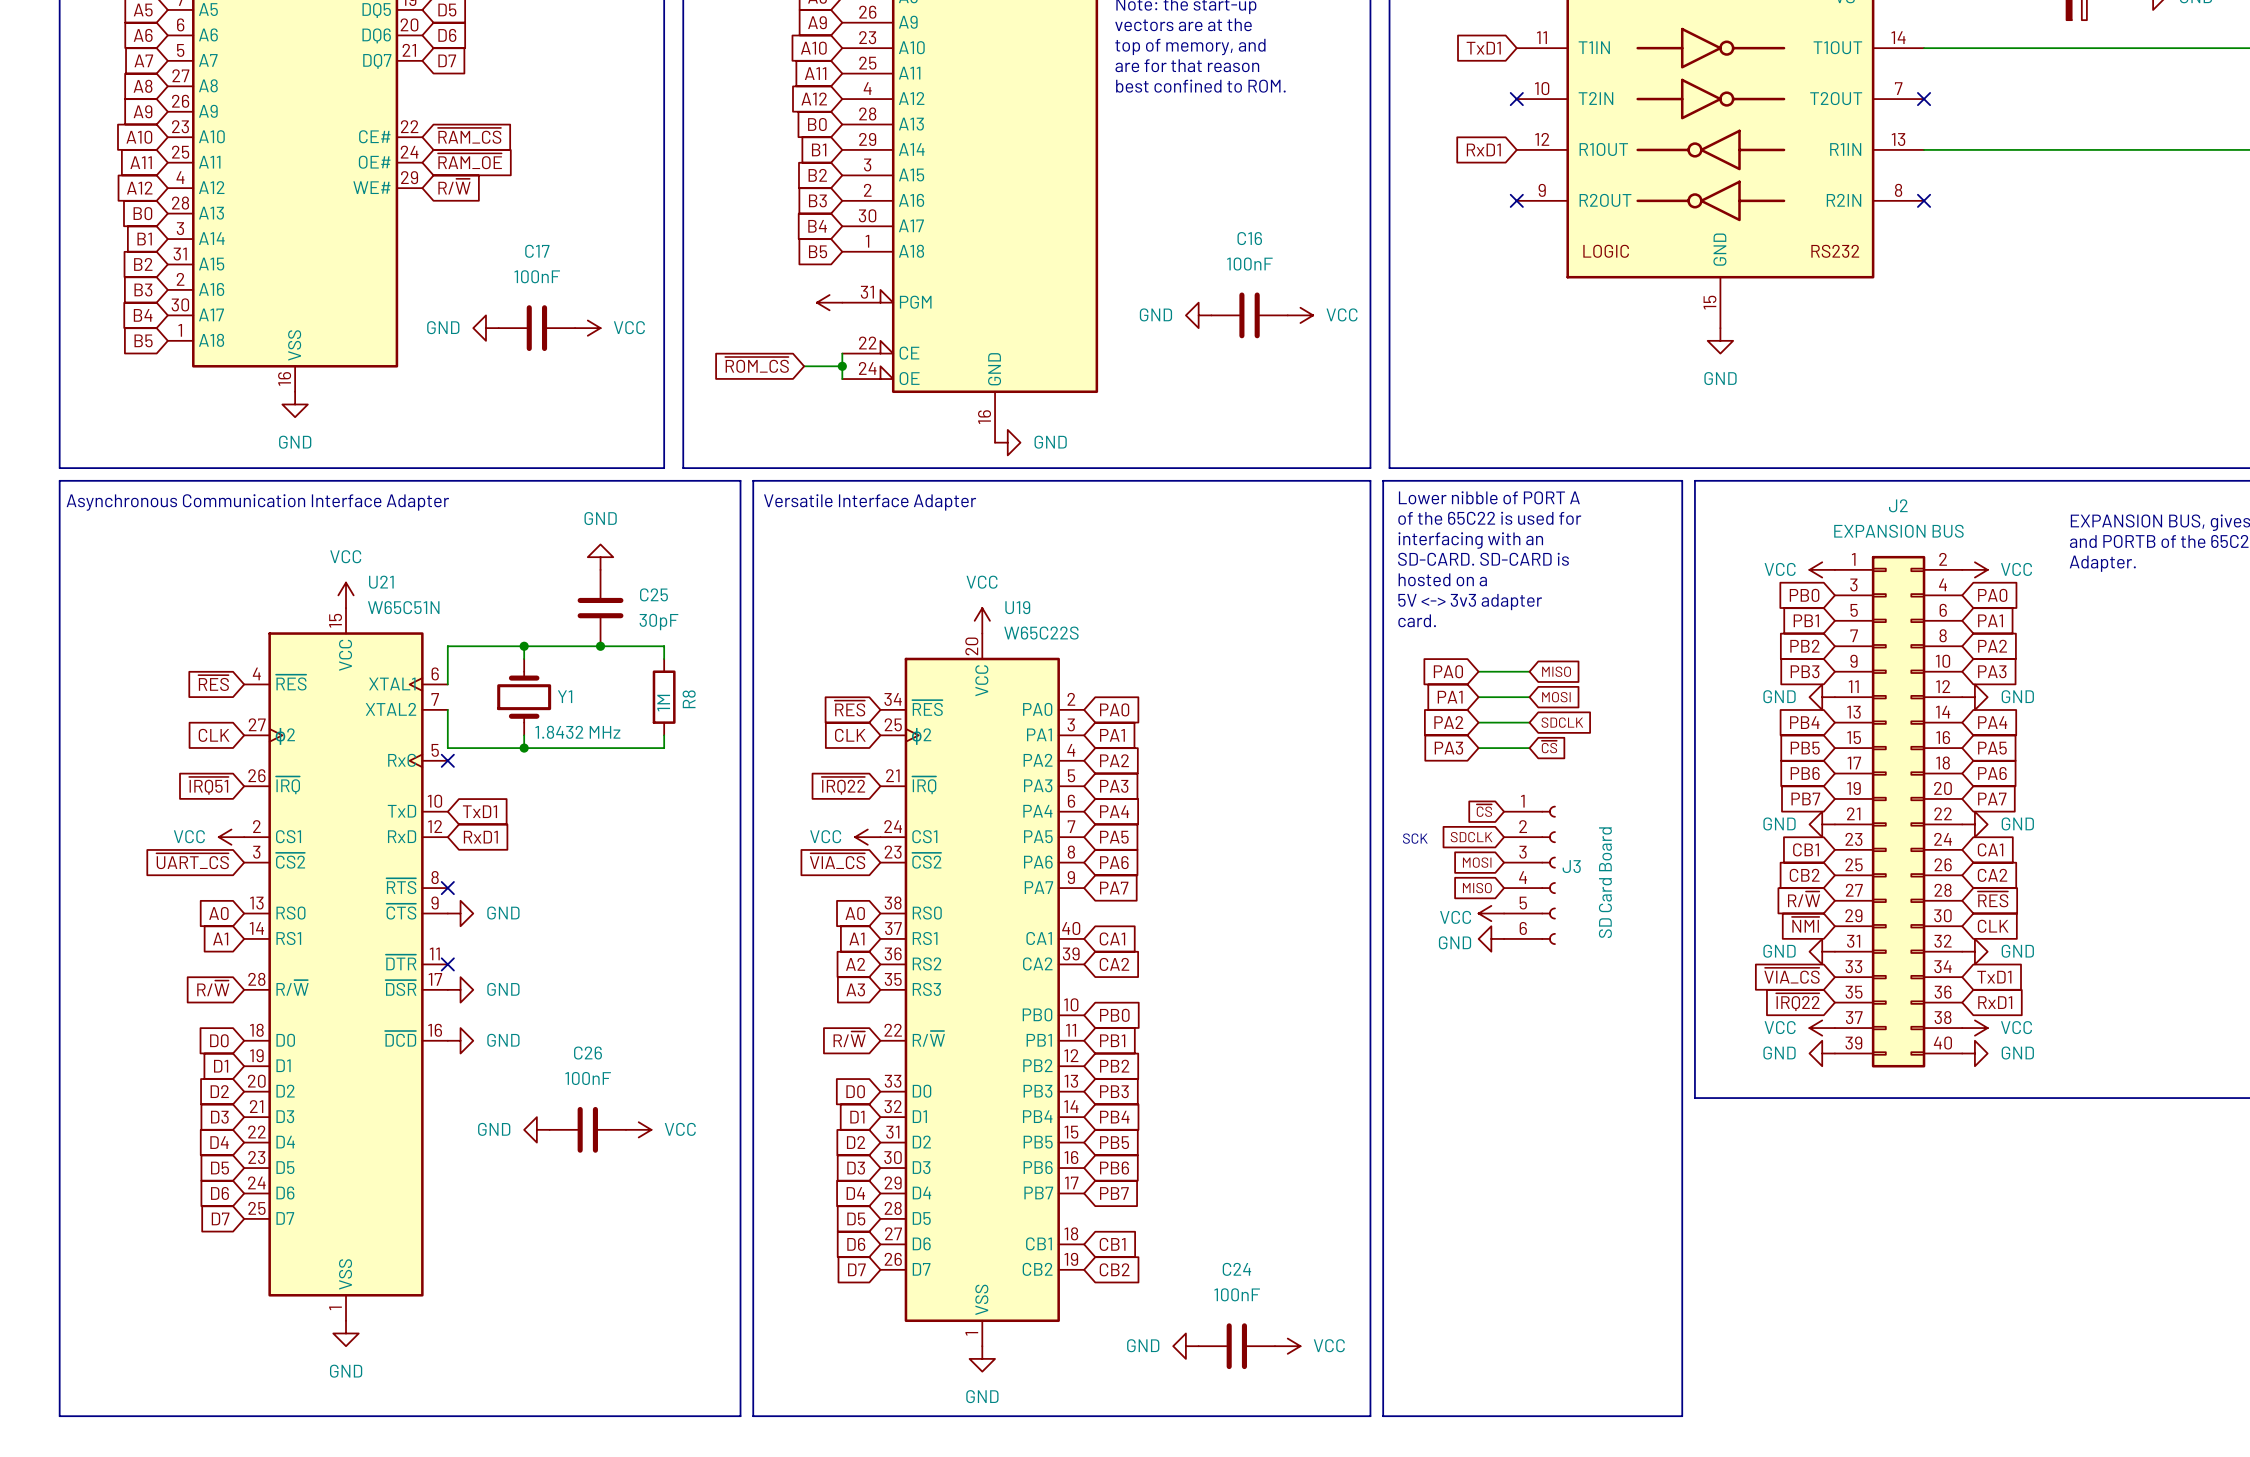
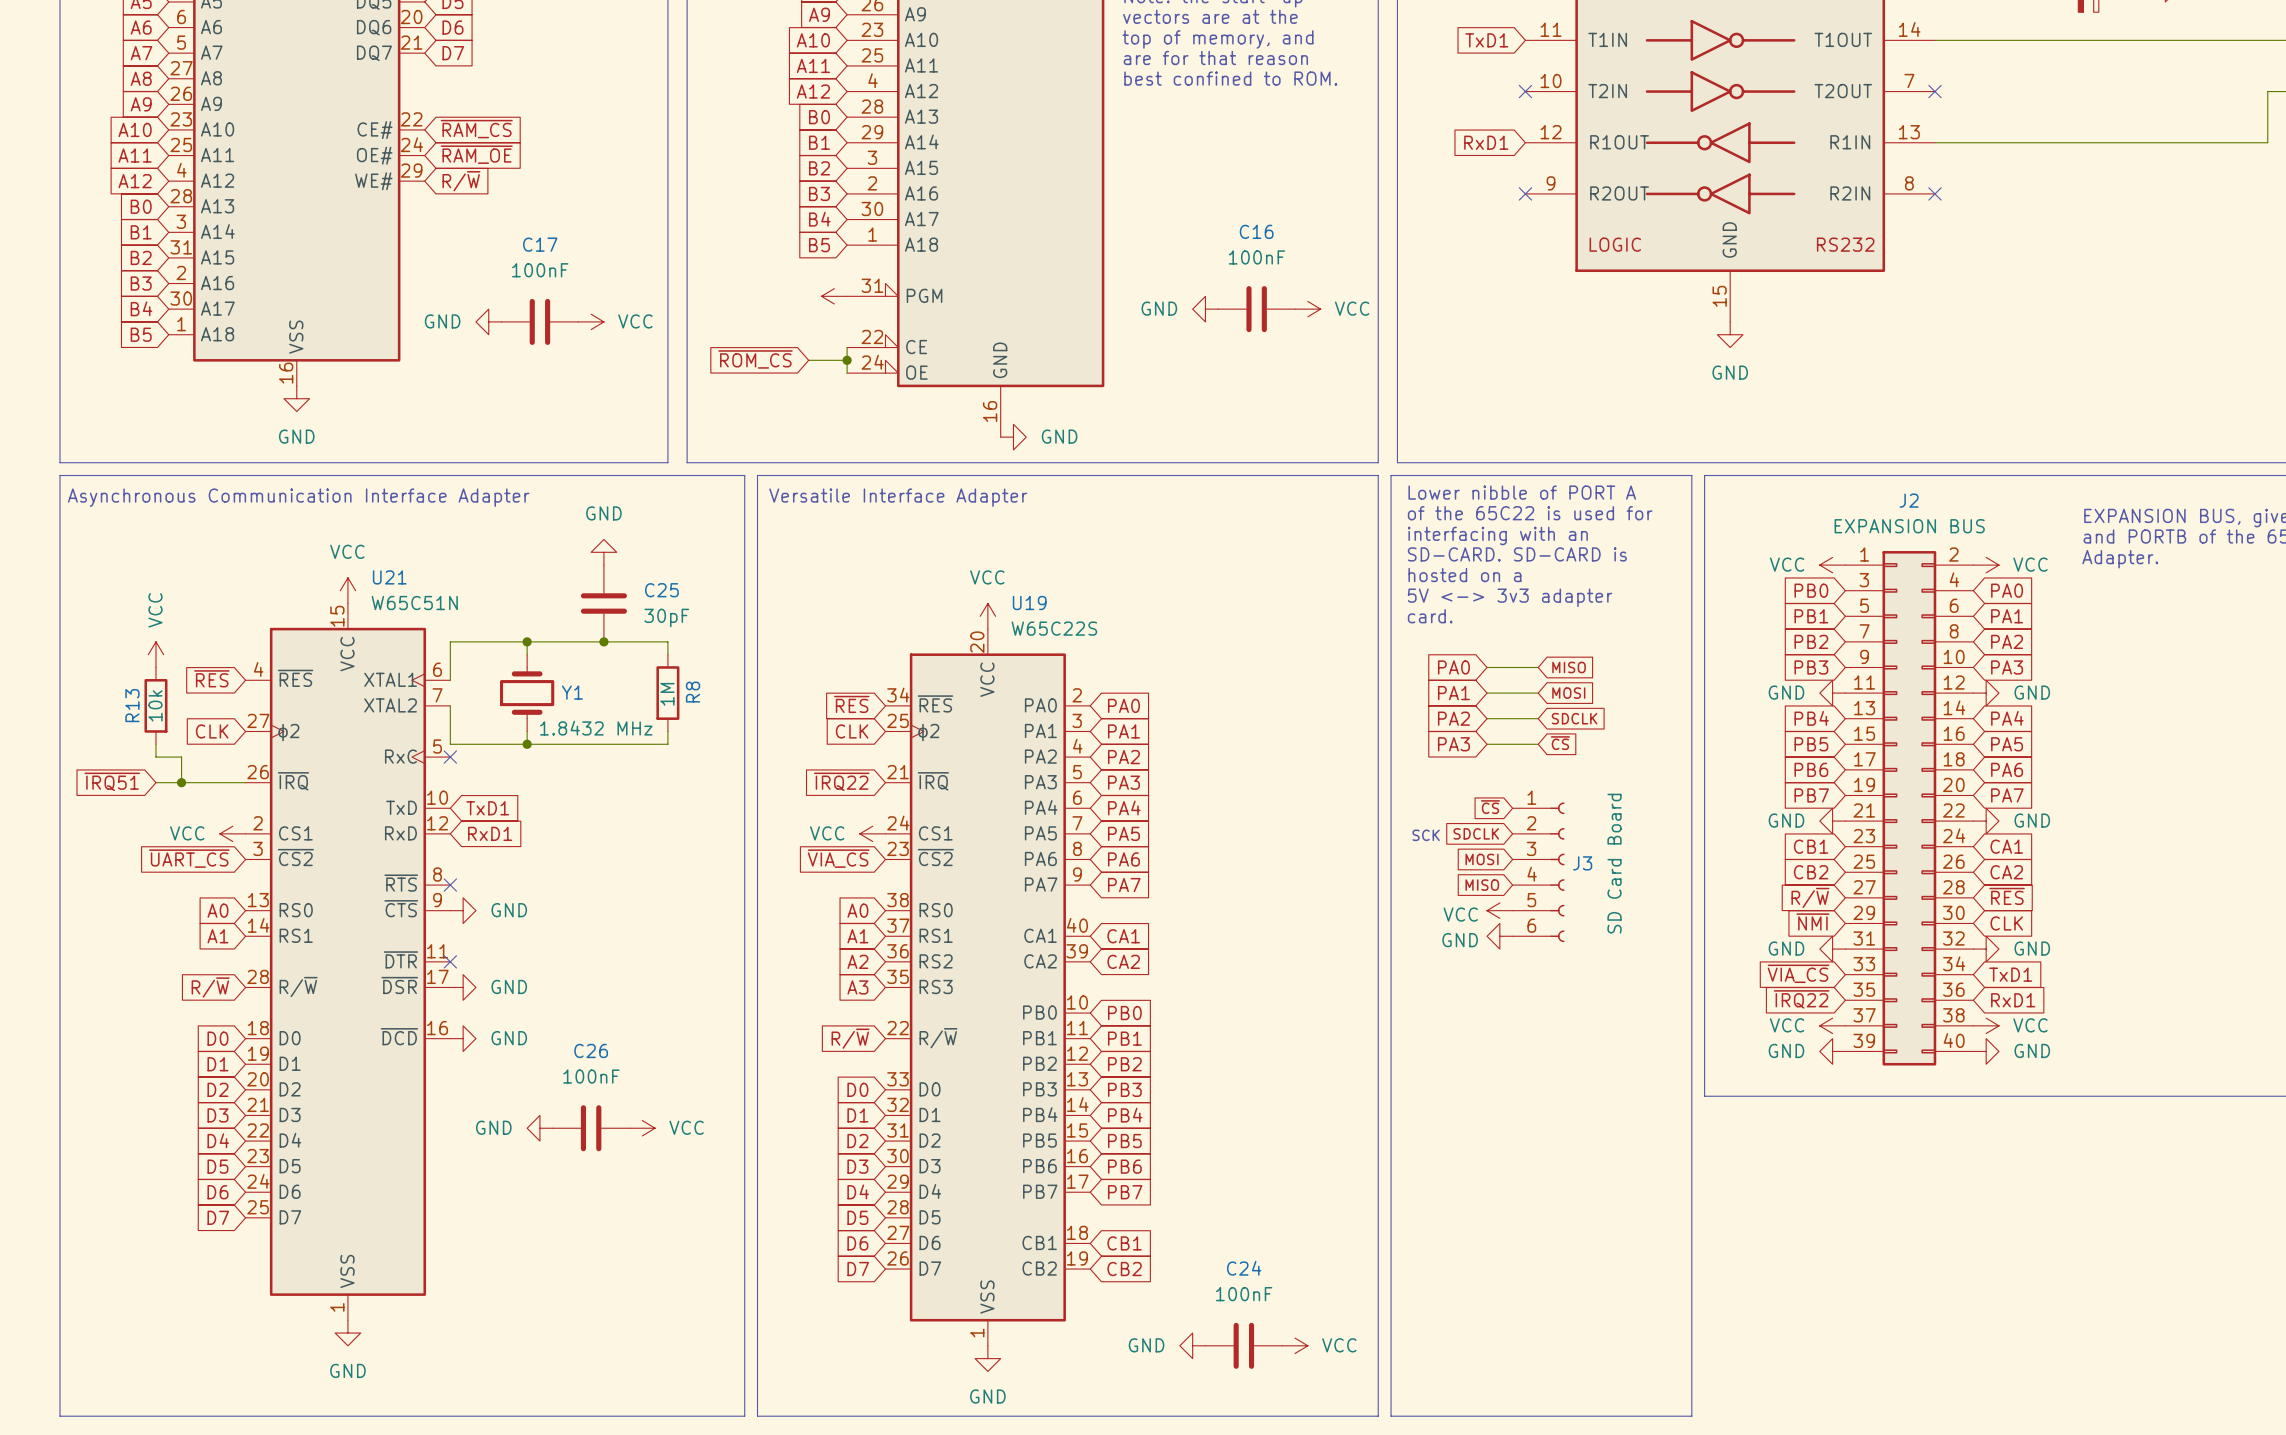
power symbol: none -> VCC (155, 654)
R13: none -> 10k (155, 705)
wire: none -> (155, 744) (155, 757) (181, 757) (181, 782)
global label position: ~{IRQ51} (208, 785) -> ~{IRQ51} (112, 781)
wire: none -> (155, 782) (245, 782)
junction: none -> (181, 782)

